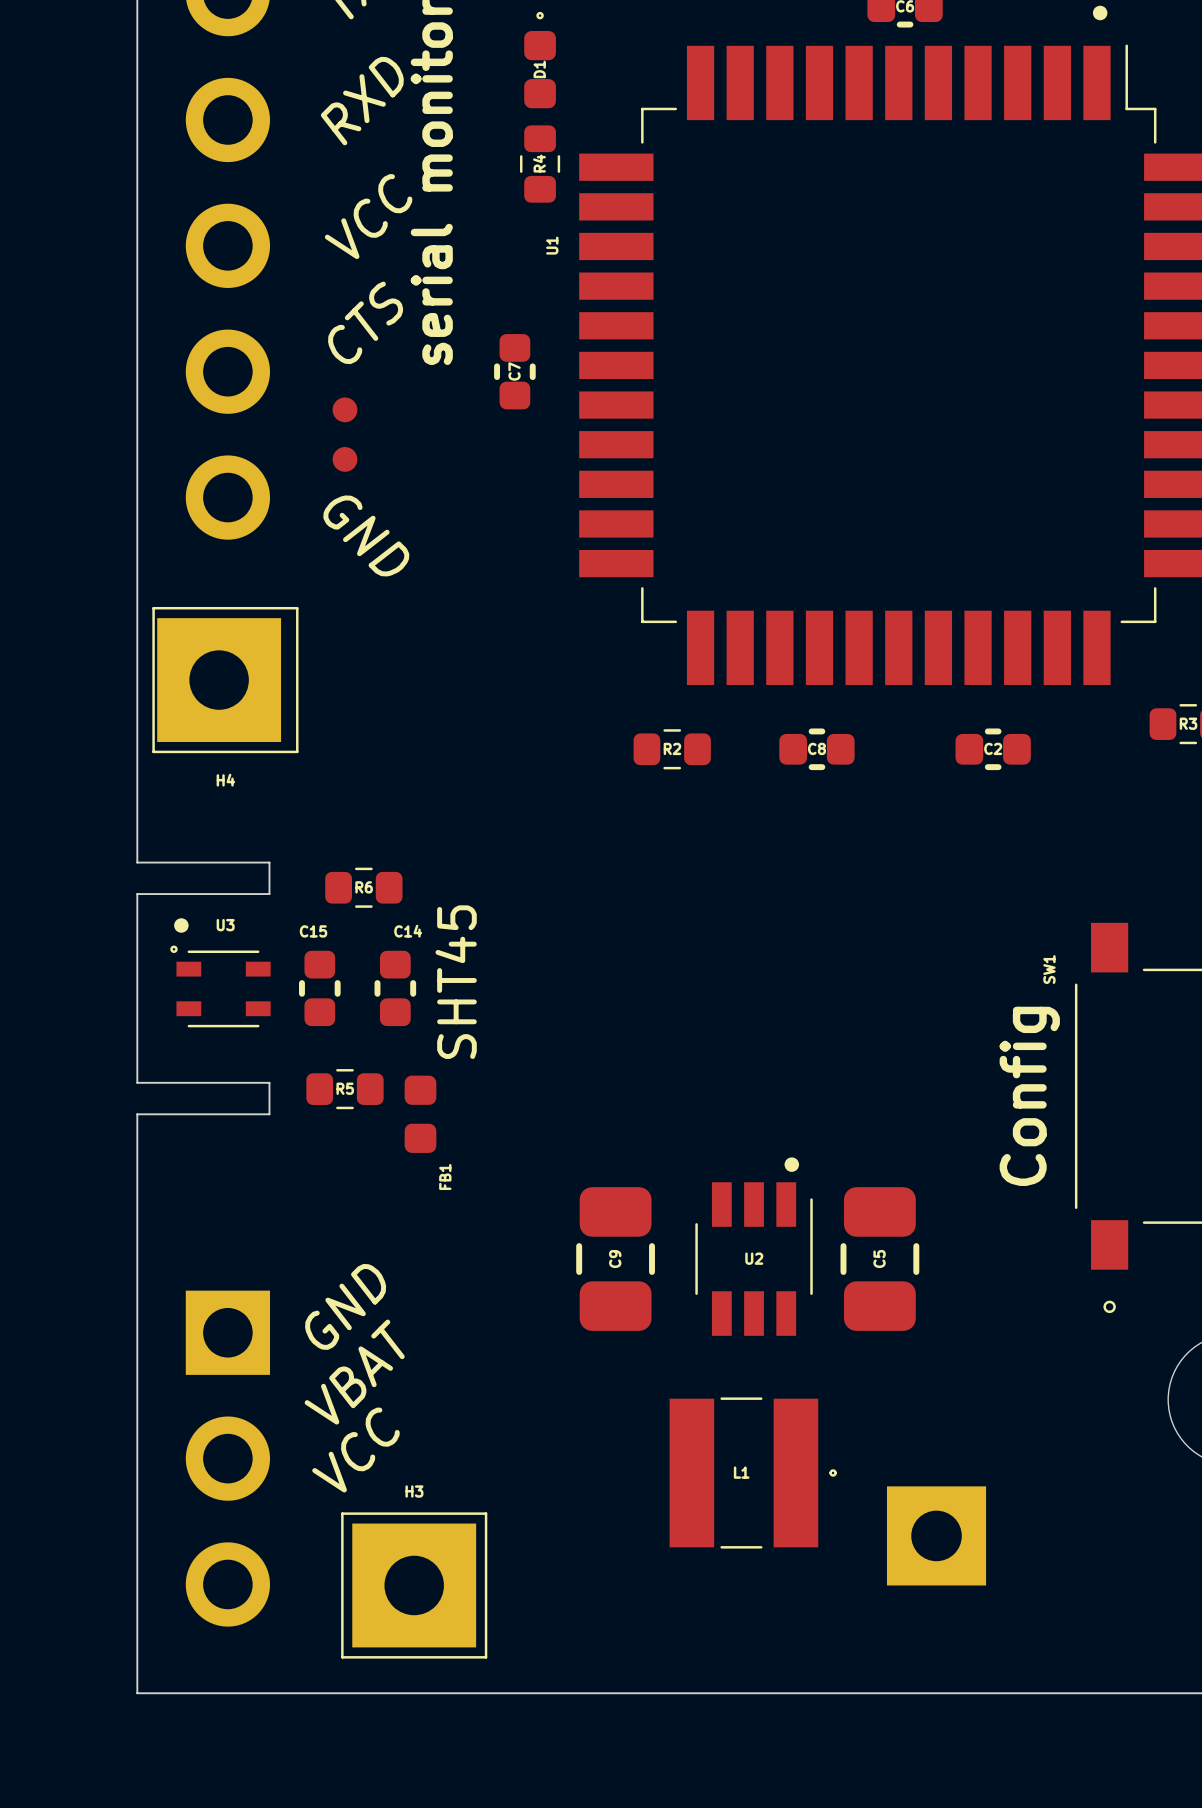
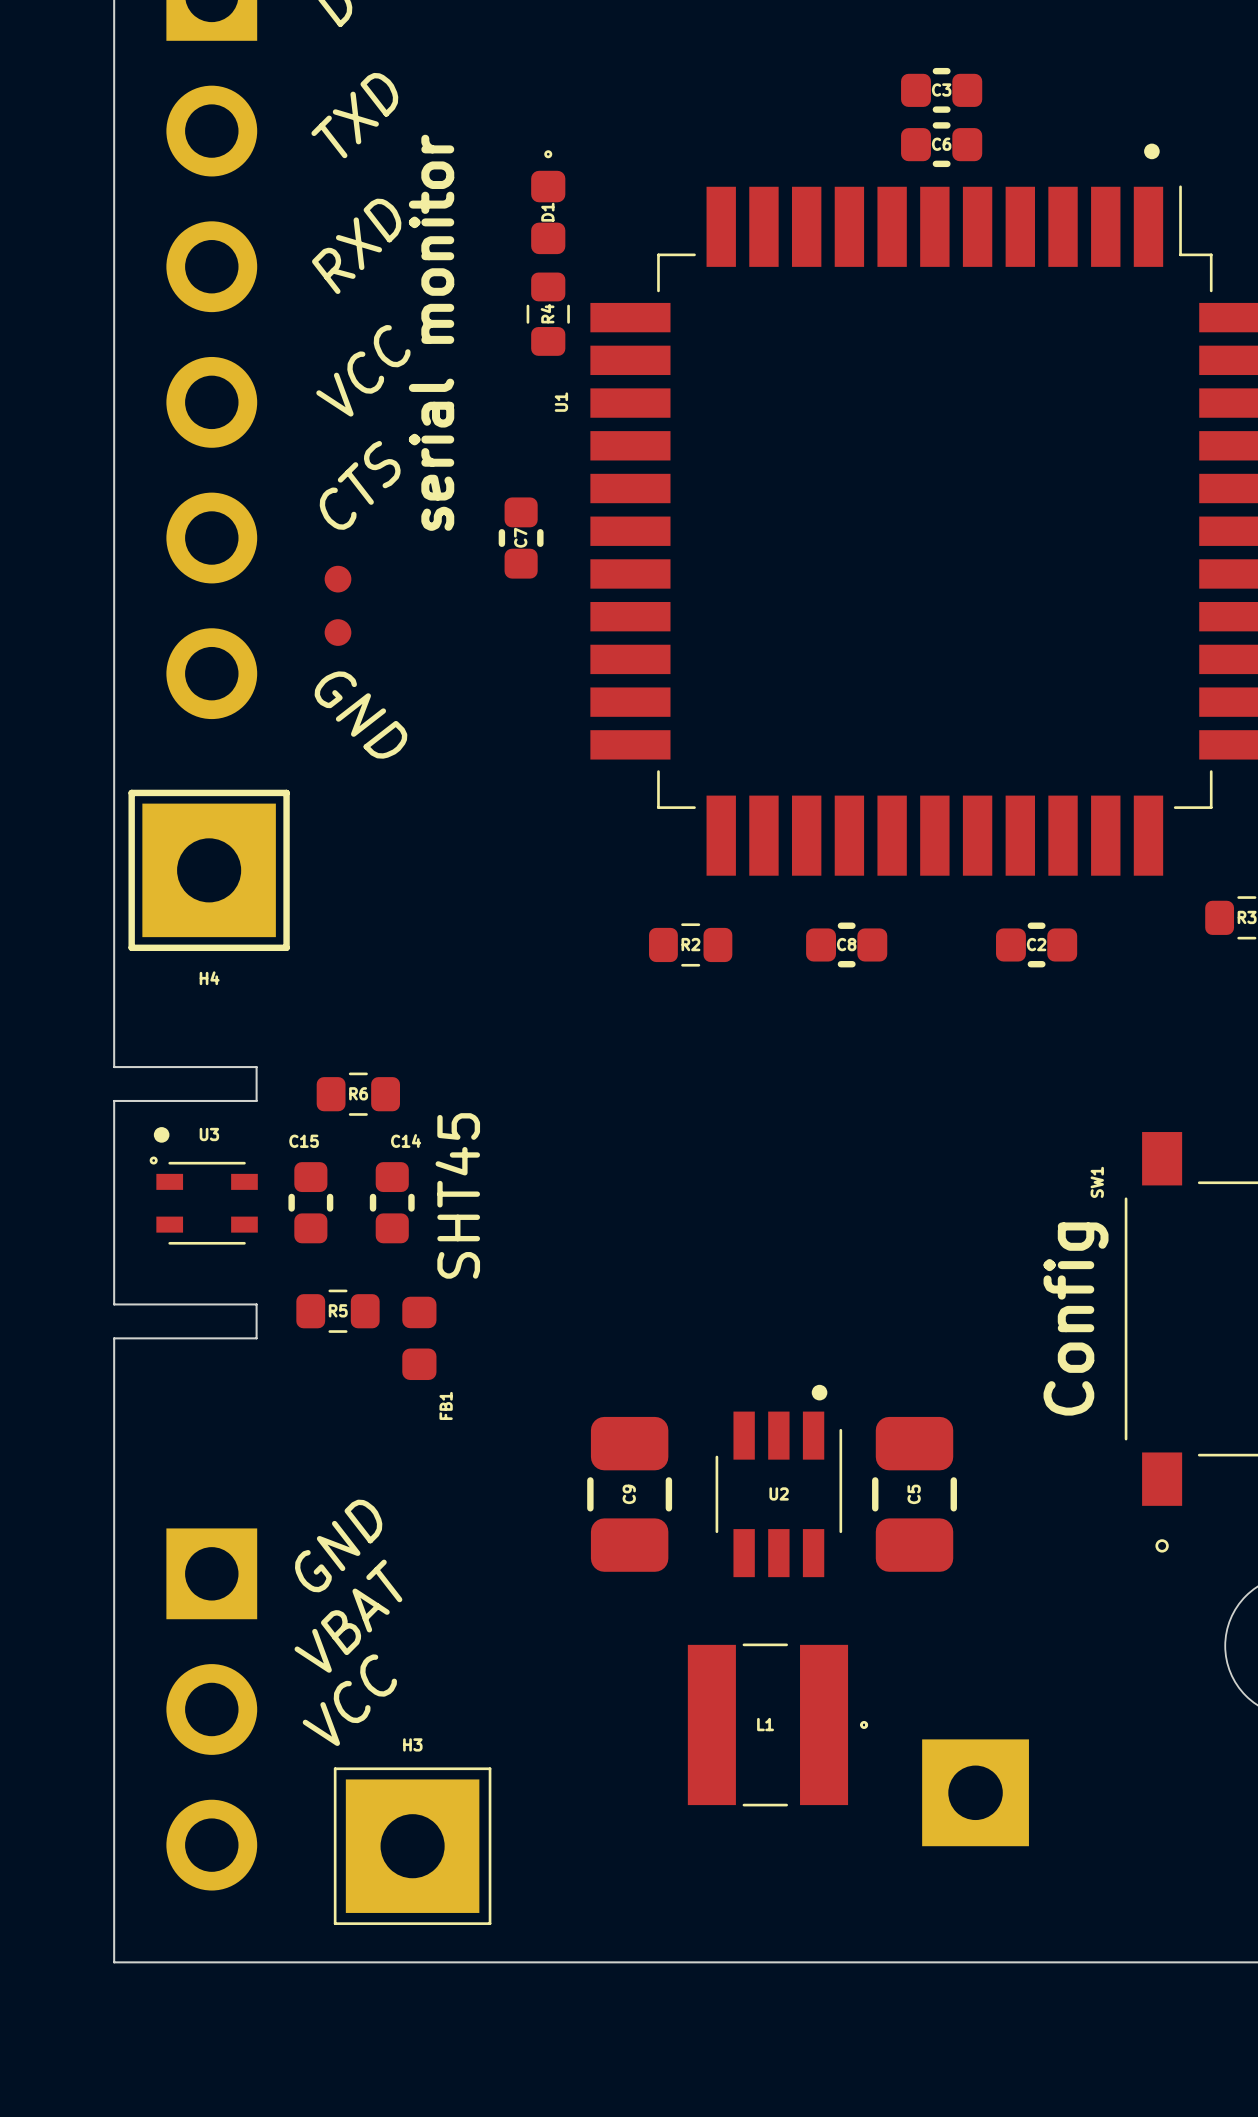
H4 footprint: [152, 606, 299, 754] -> [128, 789, 290, 952]

